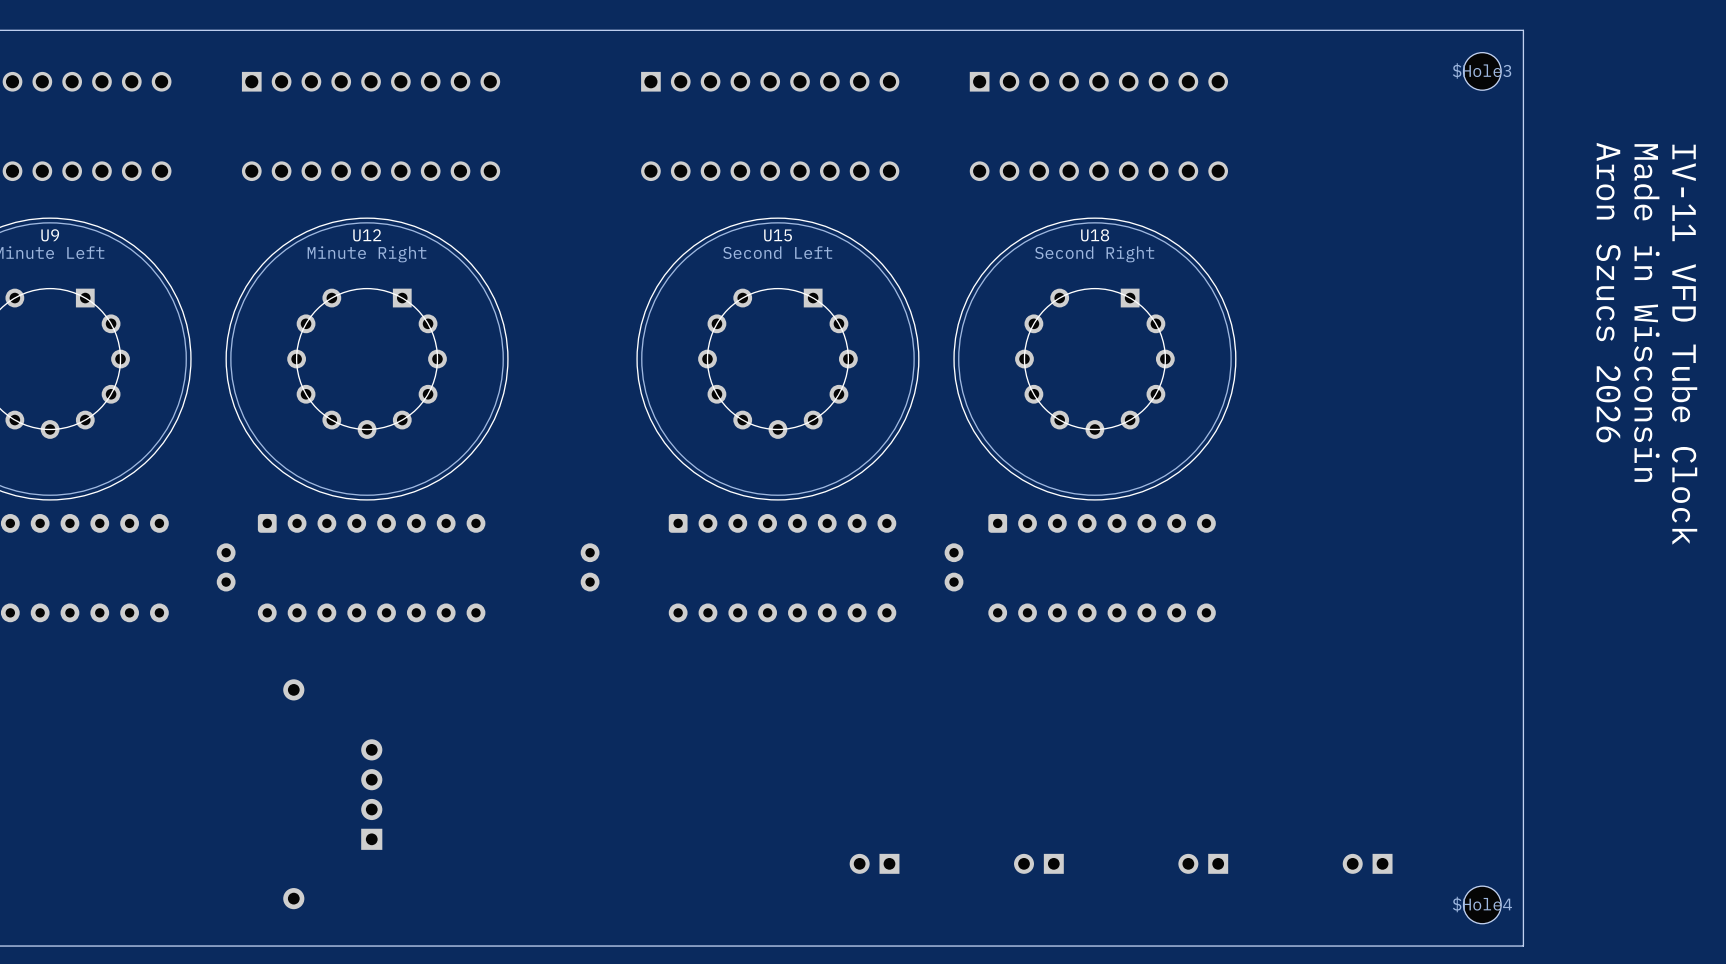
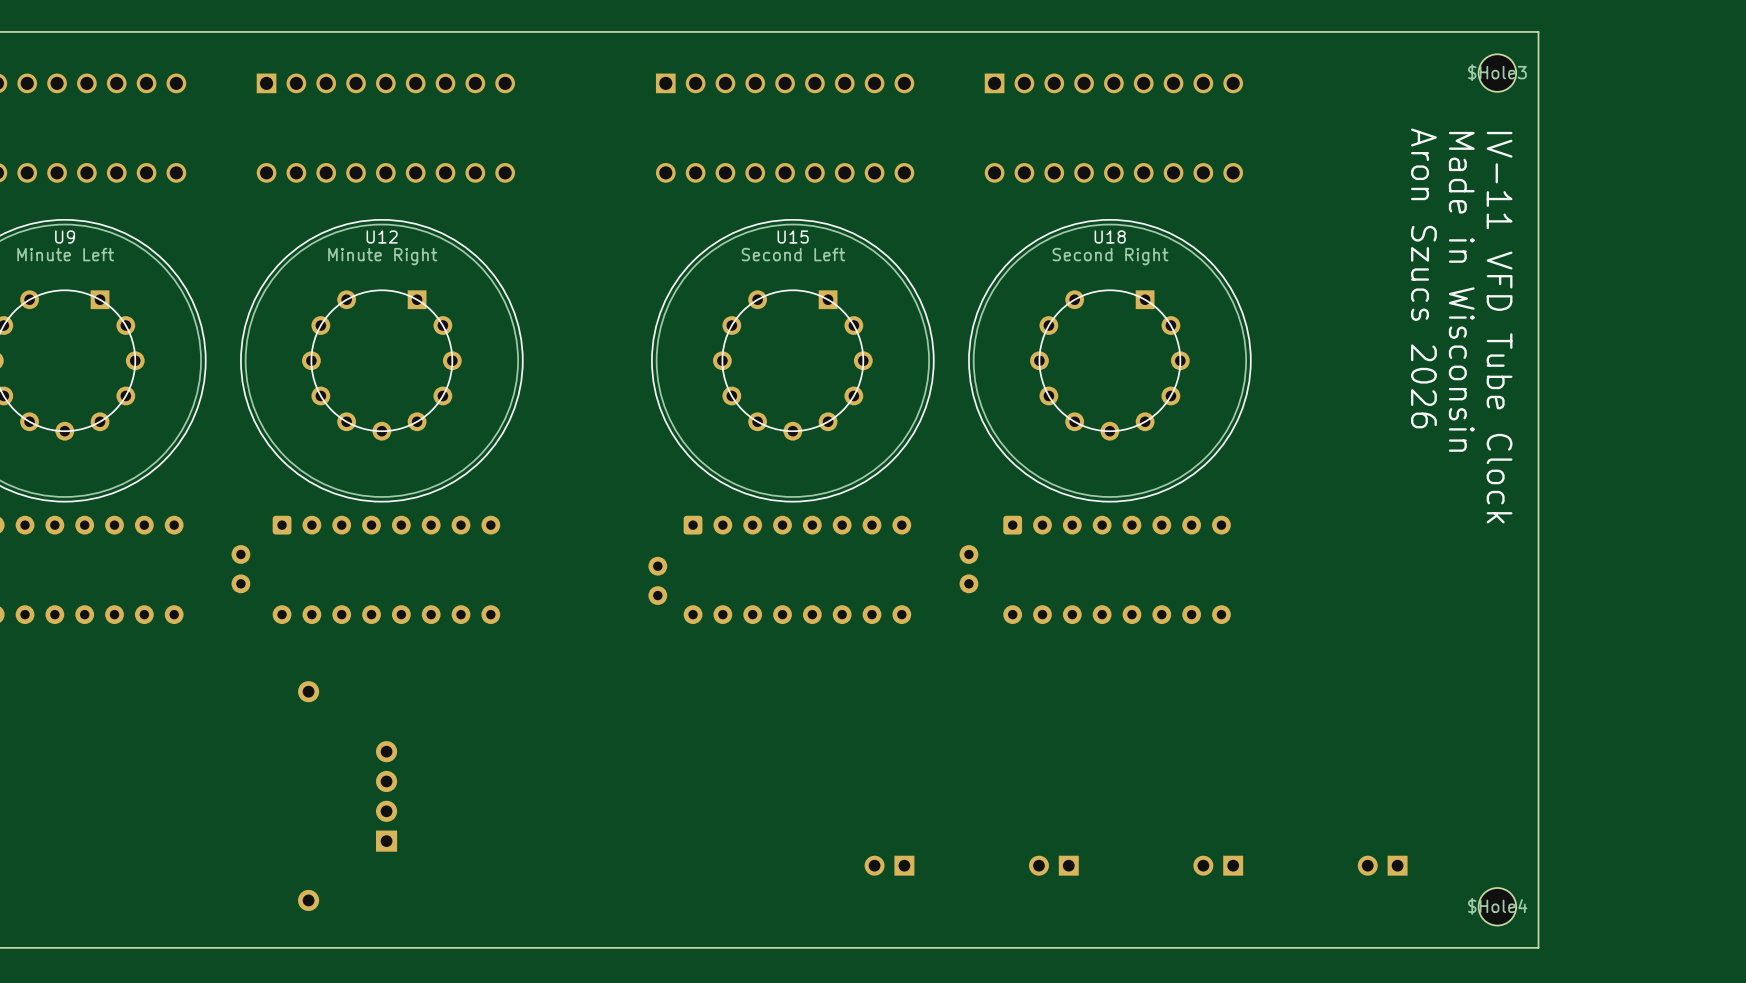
text position: Aron Szucs 2026 (1608, 292) -> Aron Szucs 2026 (1423, 278)
text position: Made in Wisconsin (1646, 313) -> Made in Wisconsin (1461, 291)
text position: IV-11 VFD Tube Clock (1684, 344) -> IV-11 VFD Tube Clock (1499, 327)
part position: (590, 567) -> (657, 580)

